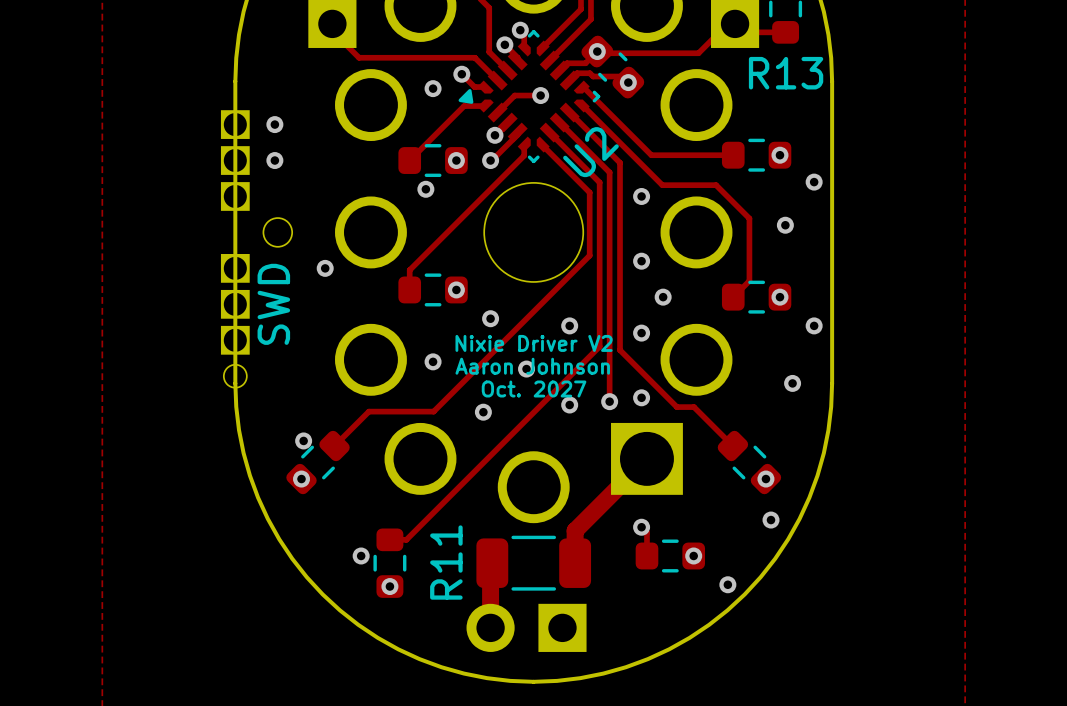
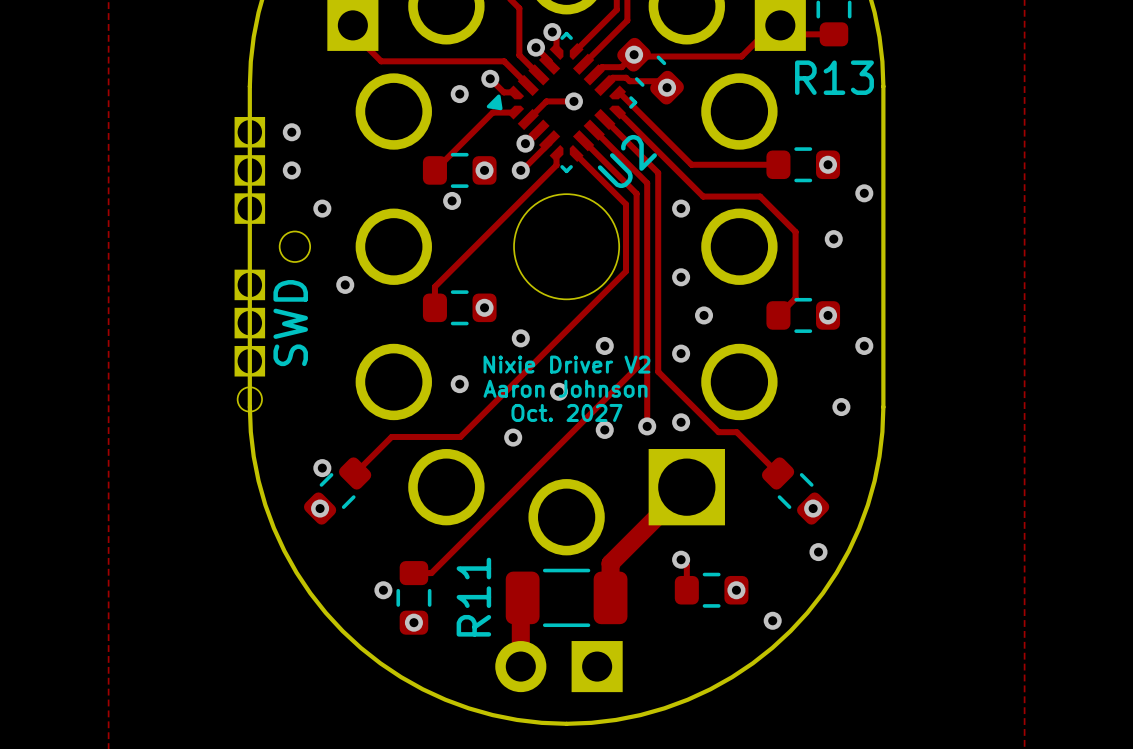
via: none -> (322, 208)

